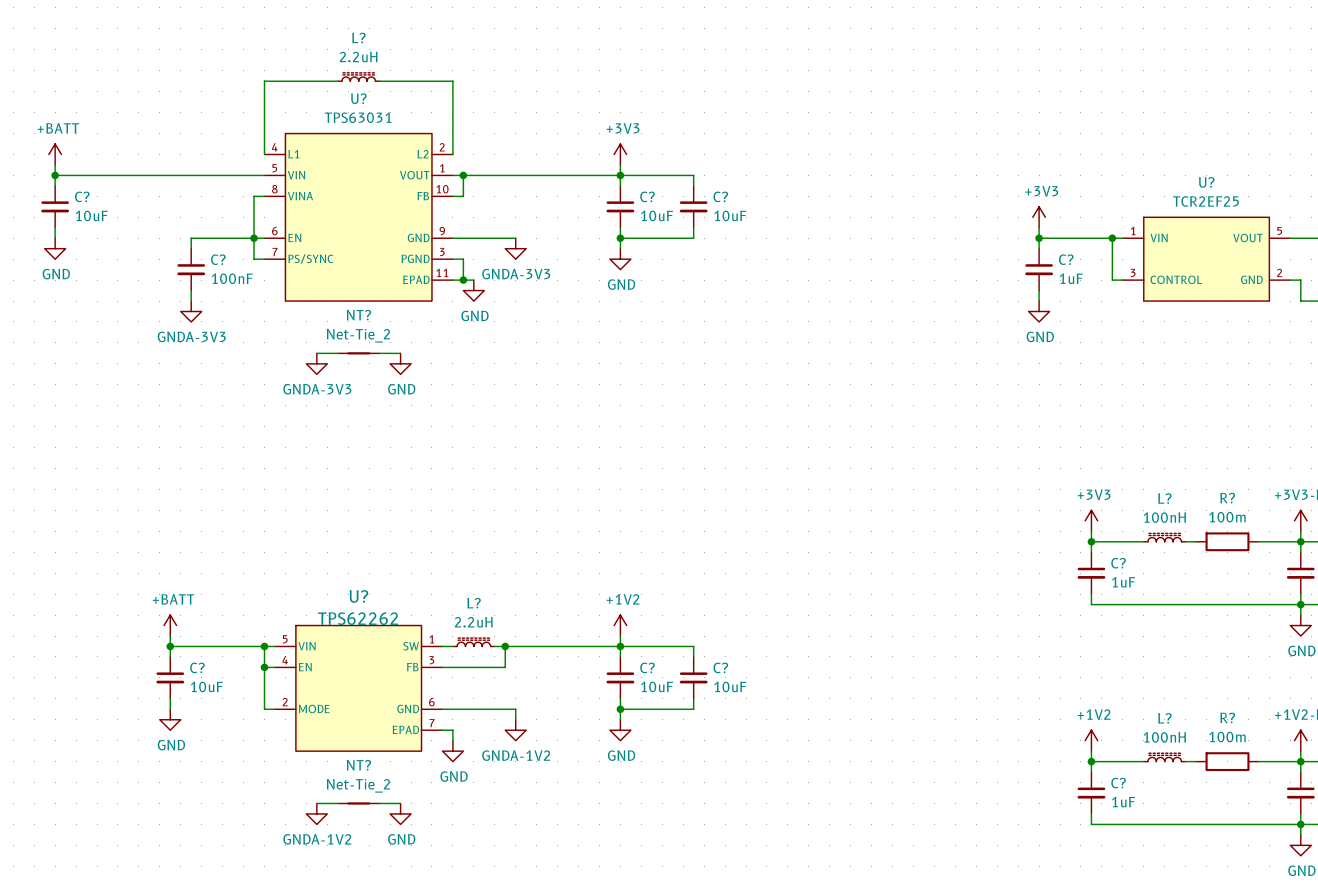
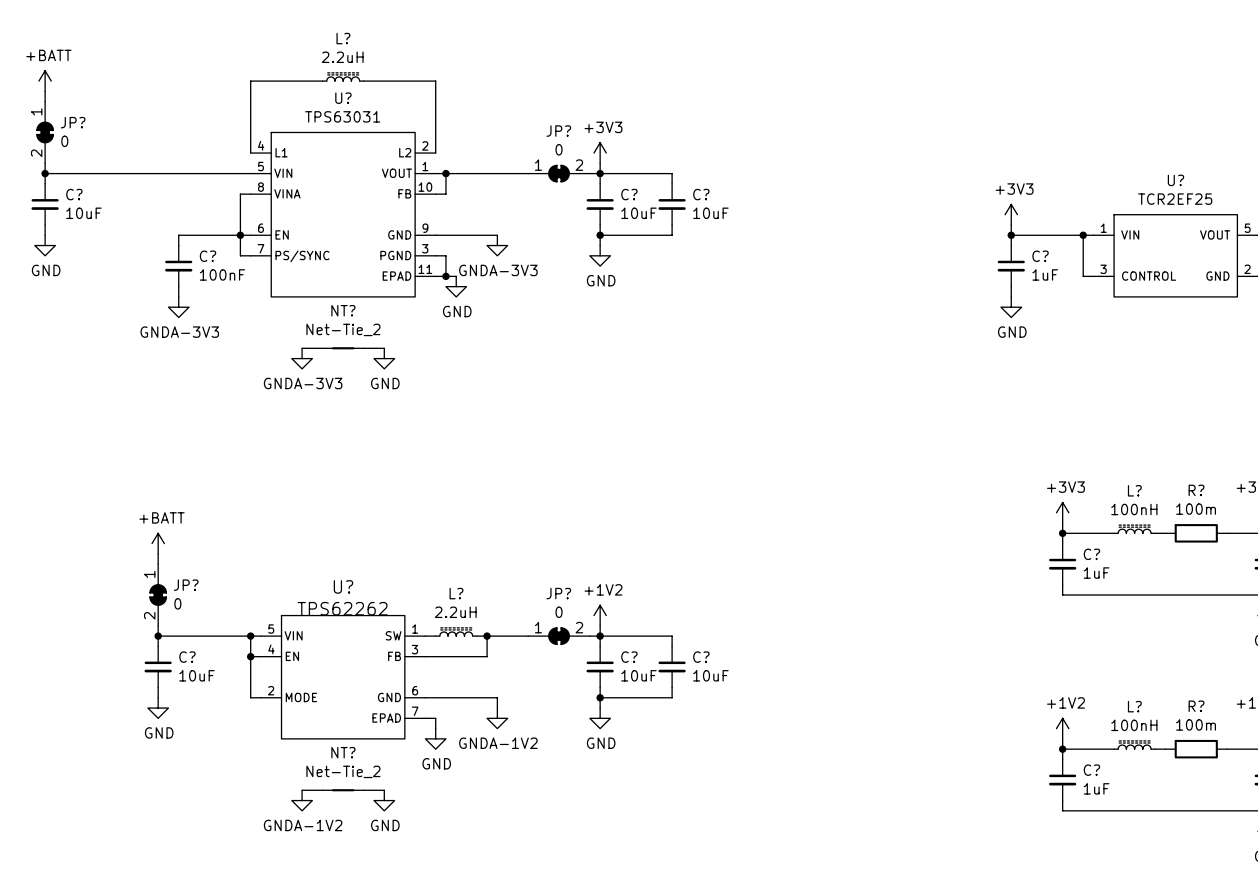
wire: none -> (45, 91) (45, 101)
JP?: none -> 0 (45, 132)
power symbol position: +BATT (55, 154) -> +BATT (45, 81)
JP?: none -> 0 (559, 173)
wire: none -> (158, 553) (158, 564)
JP?: none -> 0 (158, 595)
power symbol position: +BATT (170, 625) -> +BATT (158, 543)
JP?: none -> 0 (559, 636)

